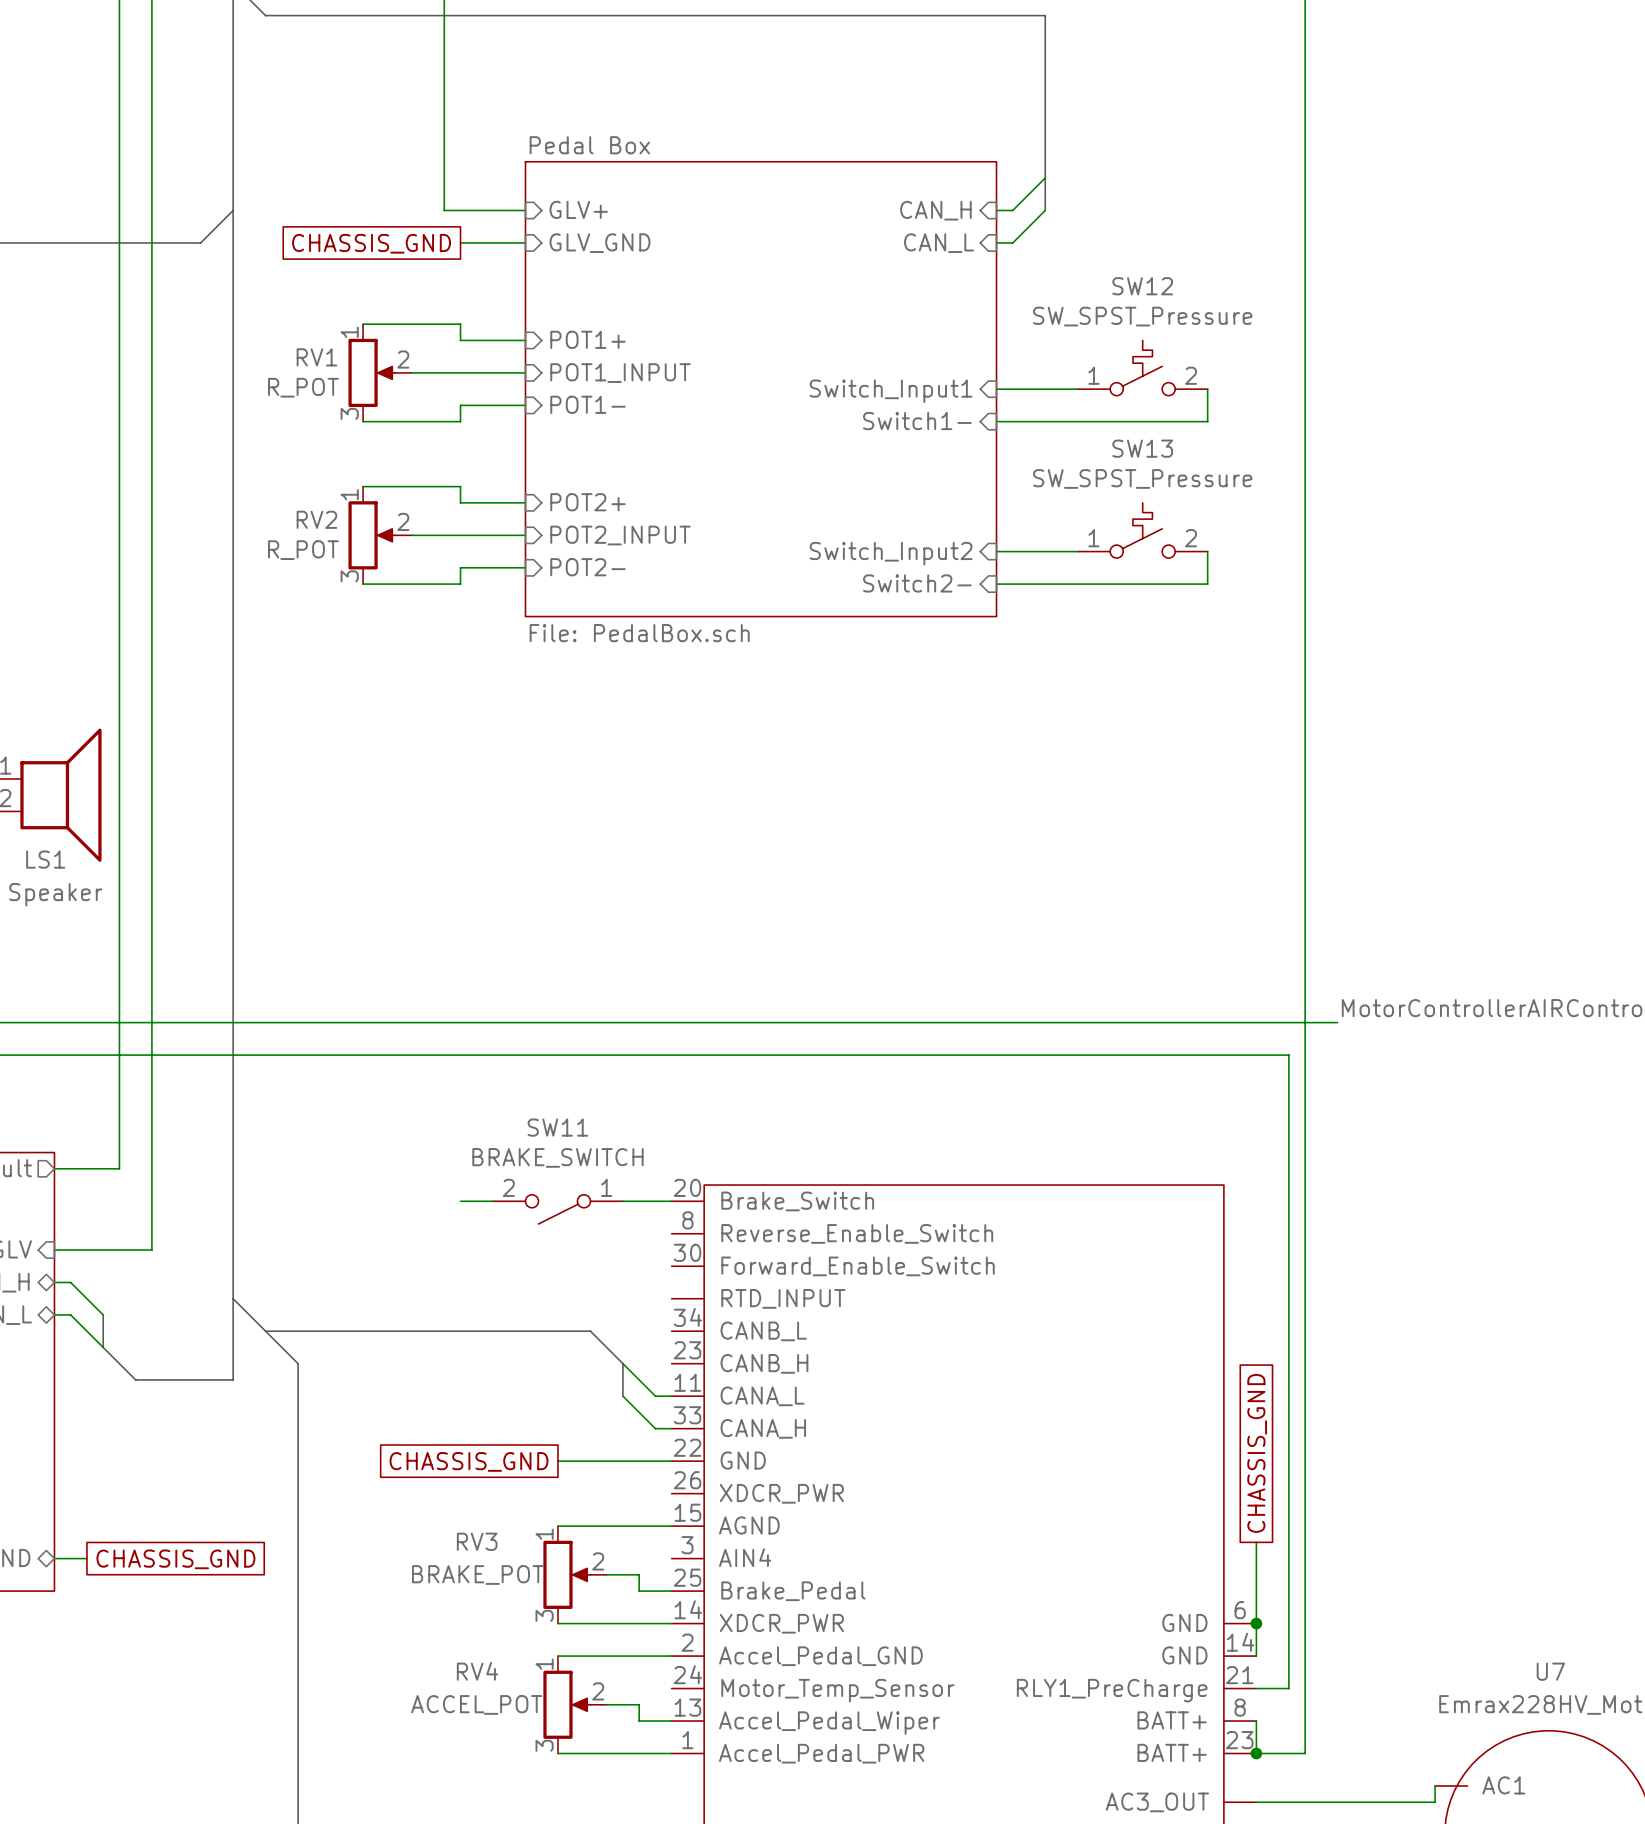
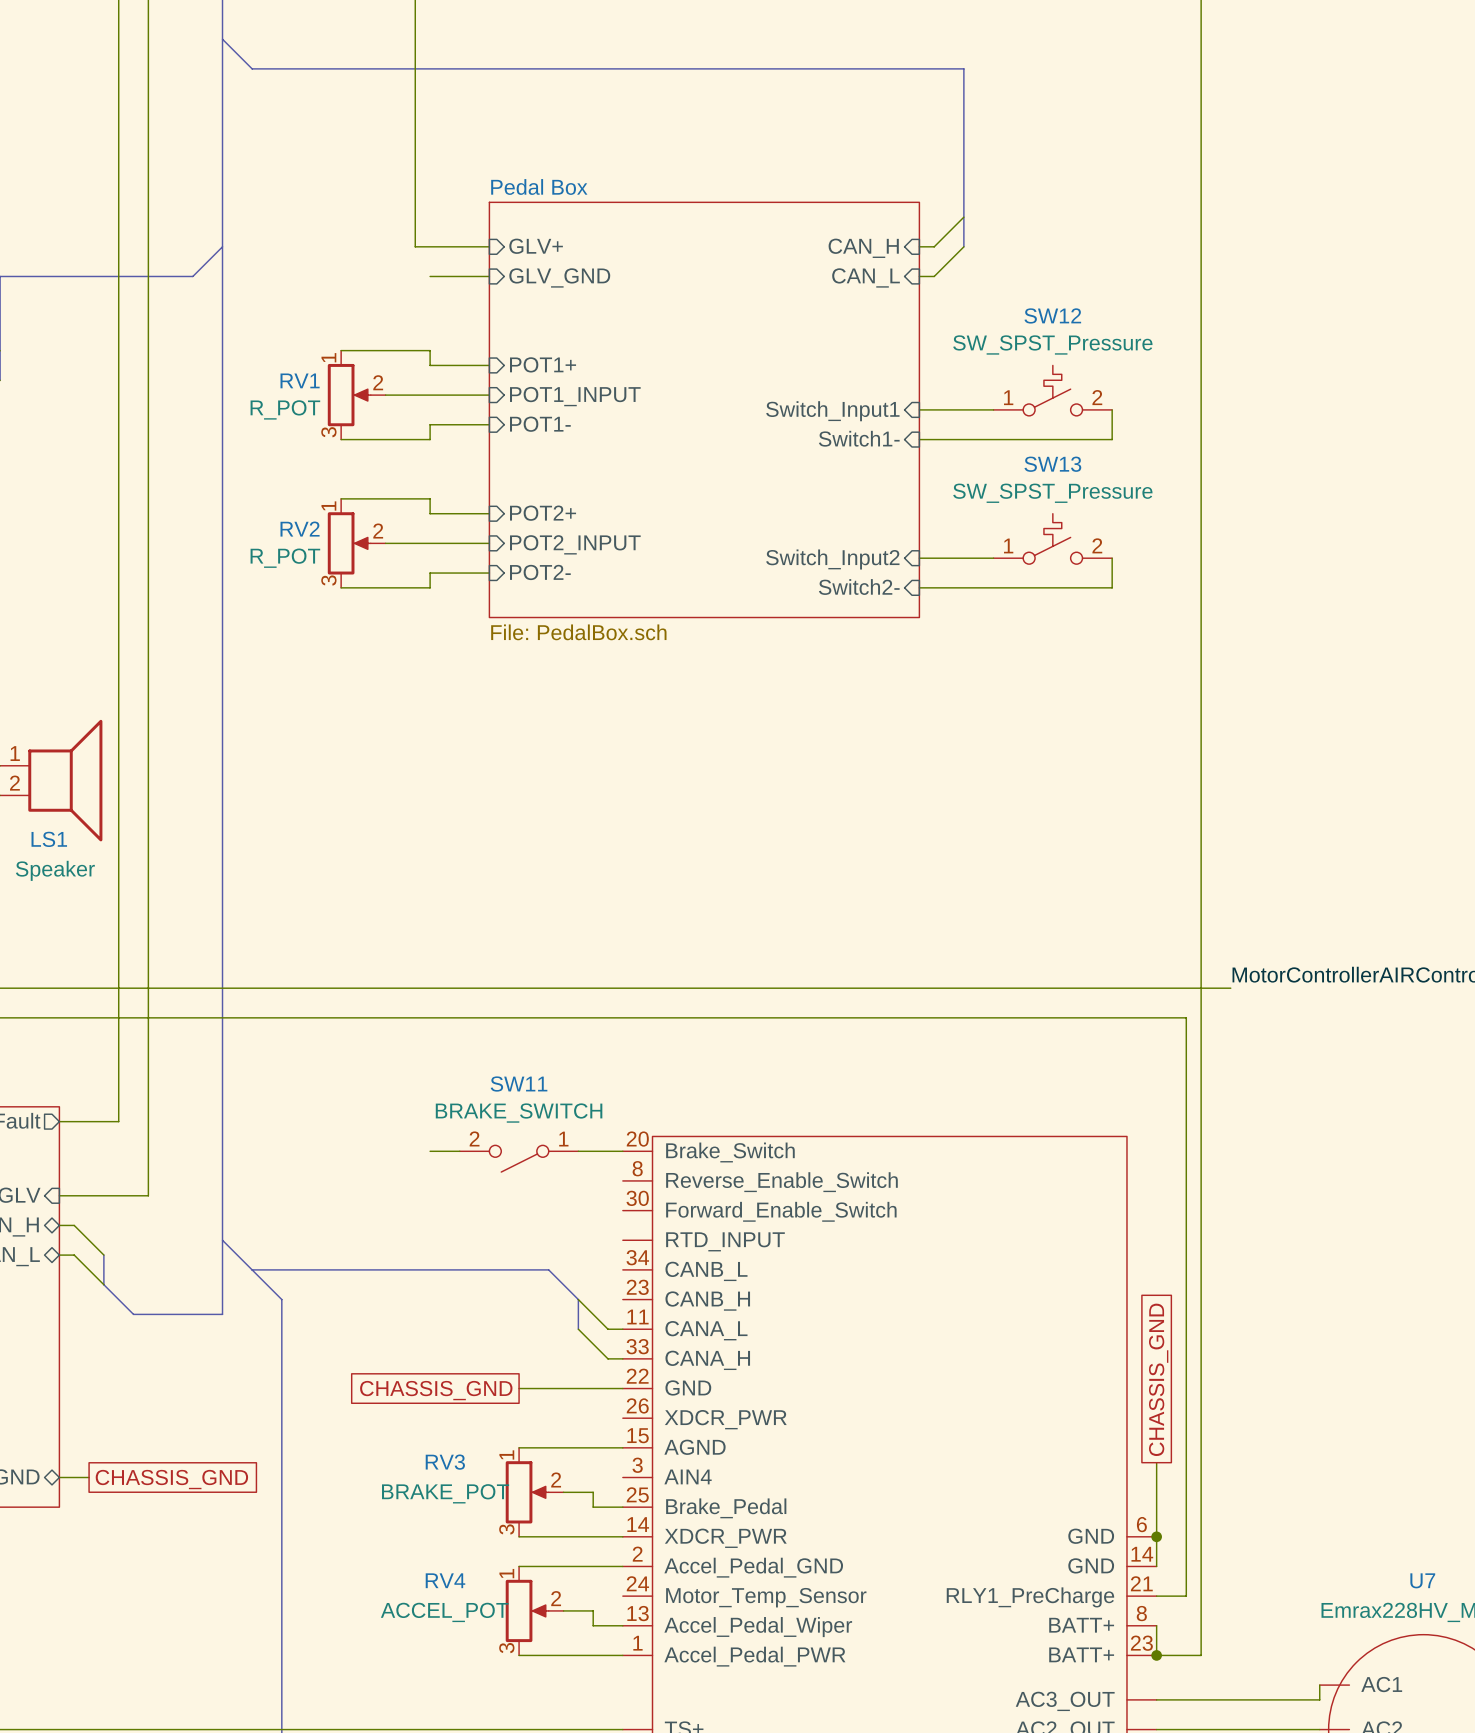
global label: CHASSIS_GND (371, 243) -> none

